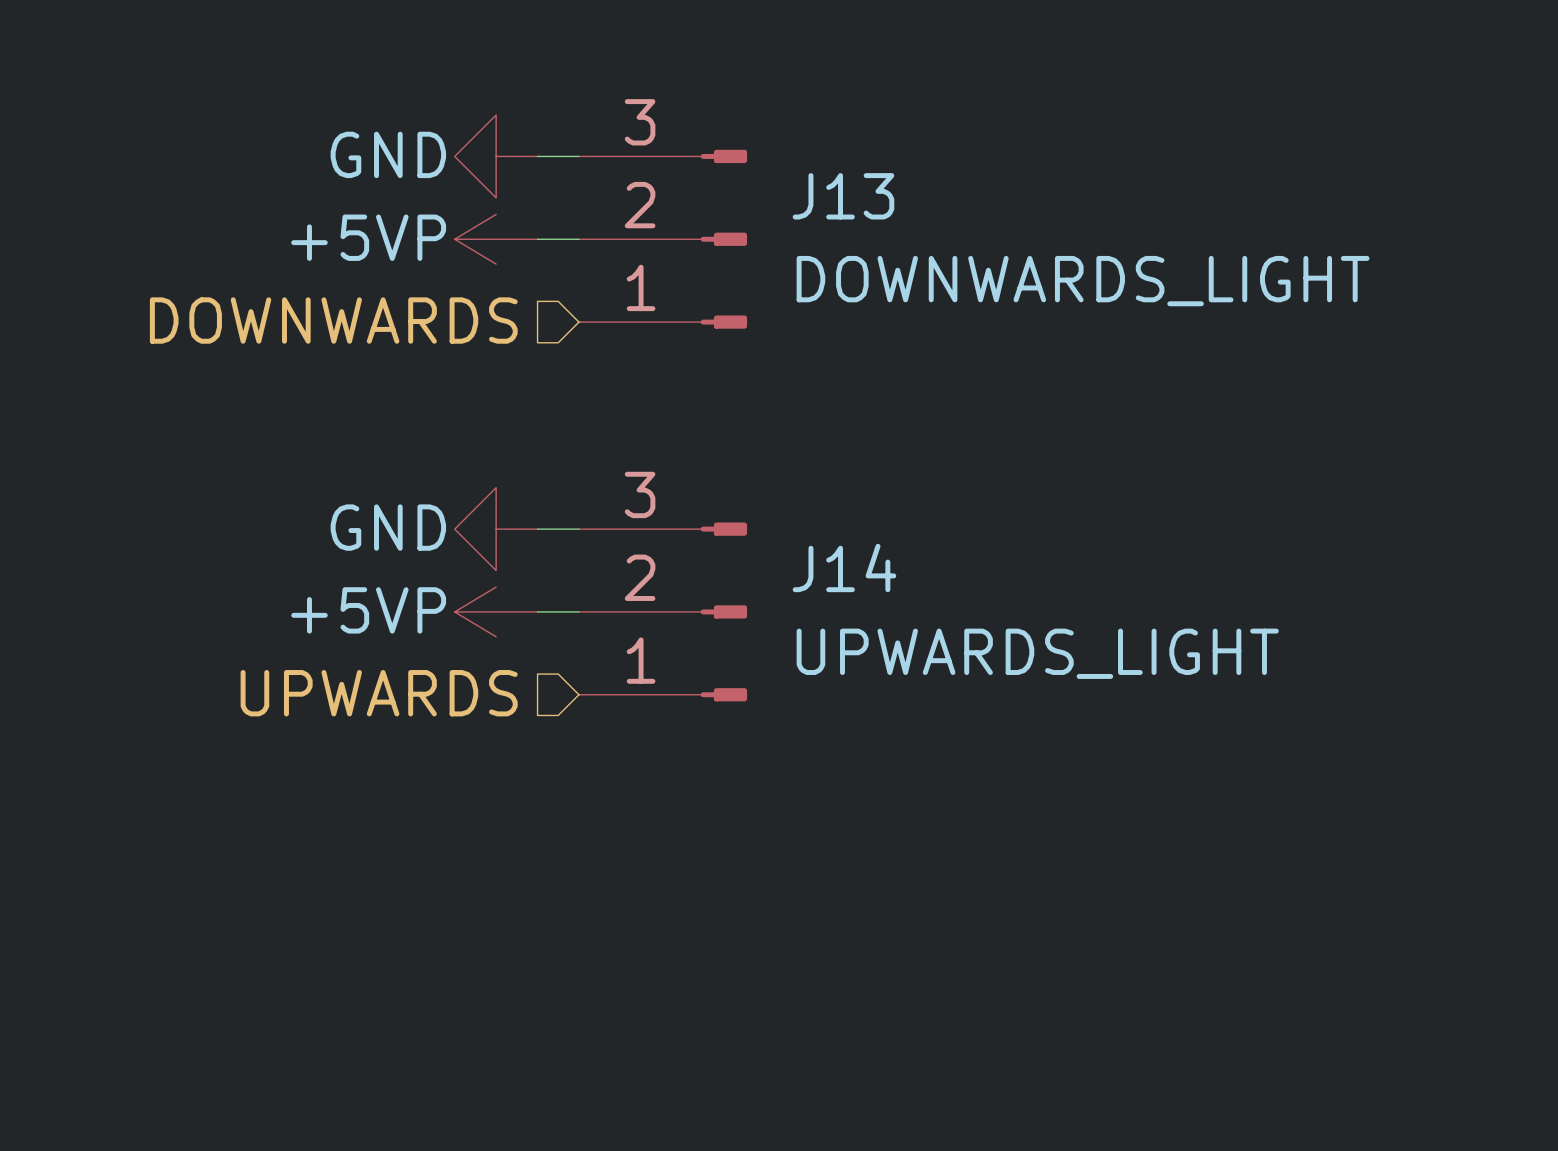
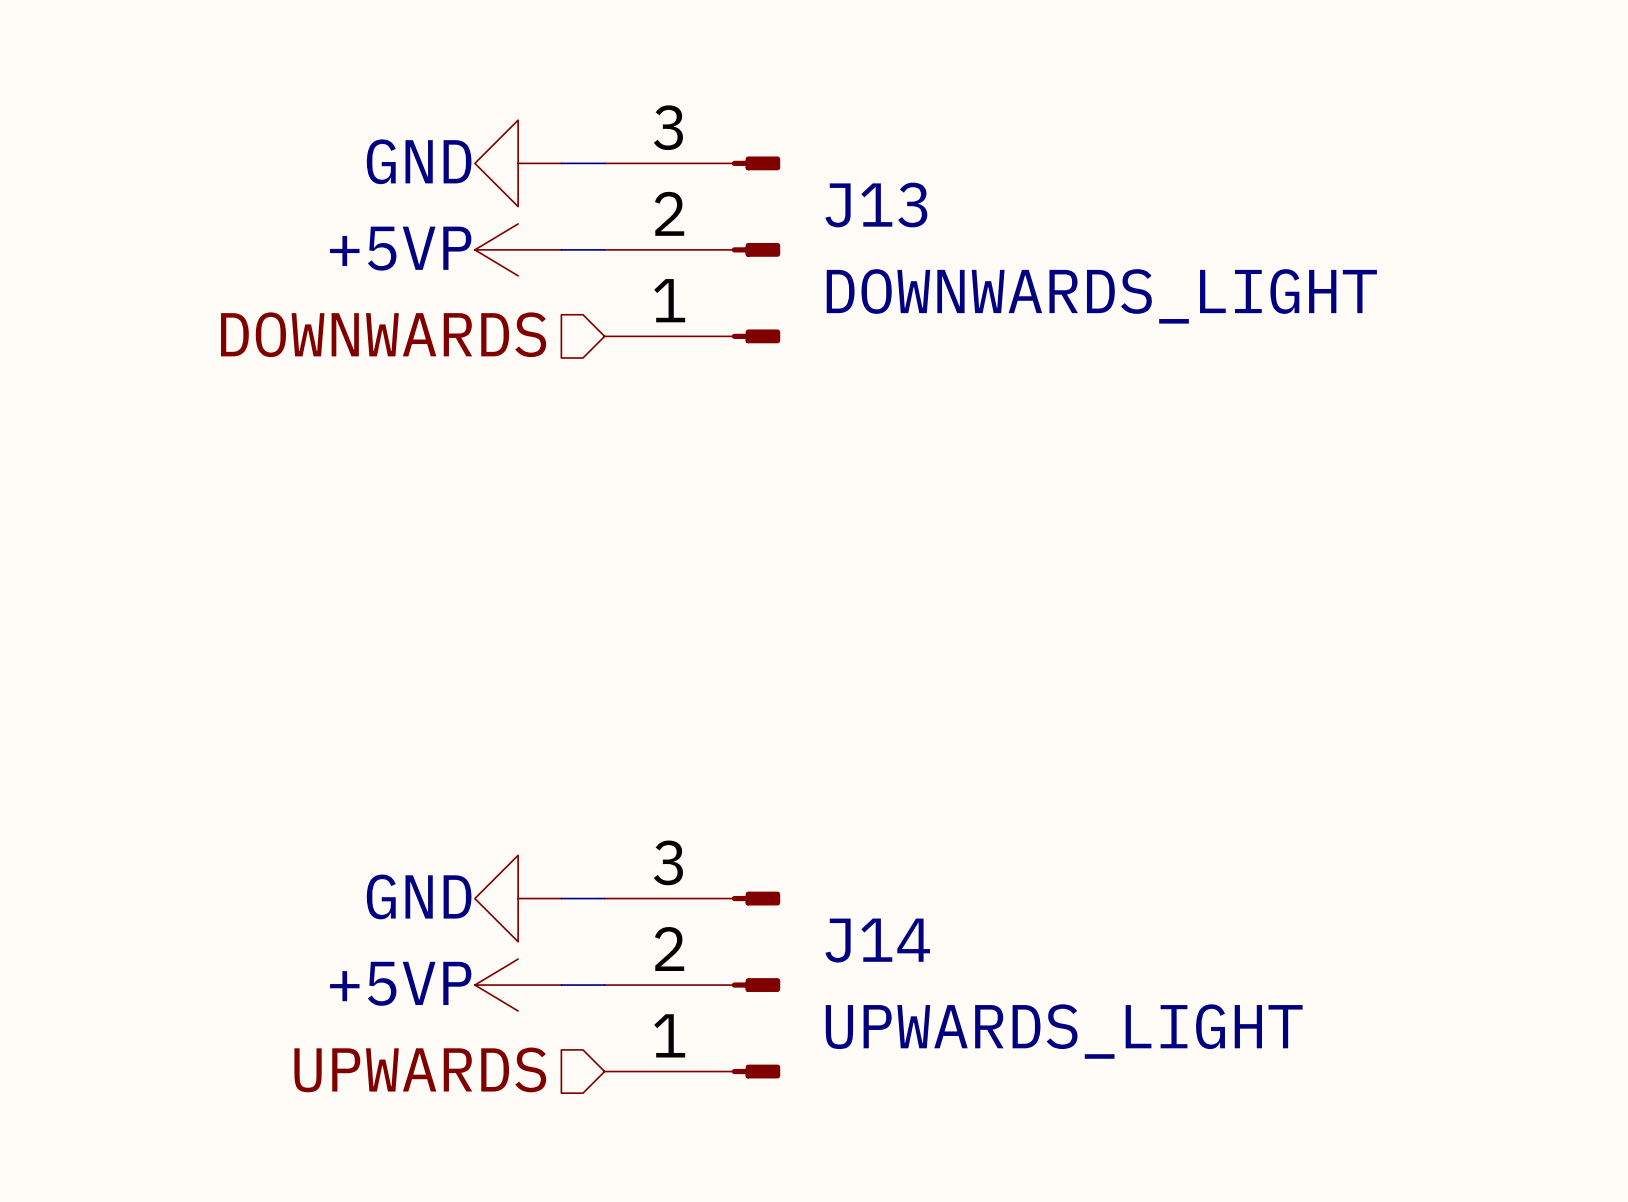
power symbol position: GND (496, 529) -> GND (518, 898)
wire: (537, 529) (578, 529) -> (561, 985) (604, 985)
power symbol position: +5VP (496, 611) -> +5VP (518, 985)
wire: (537, 611) (578, 611) -> (561, 898) (604, 898)
J14 position: (663, 611) -> (692, 985)
hierarchical label position: UPWARDS (379, 693) -> UPWARDS (420, 1069)

